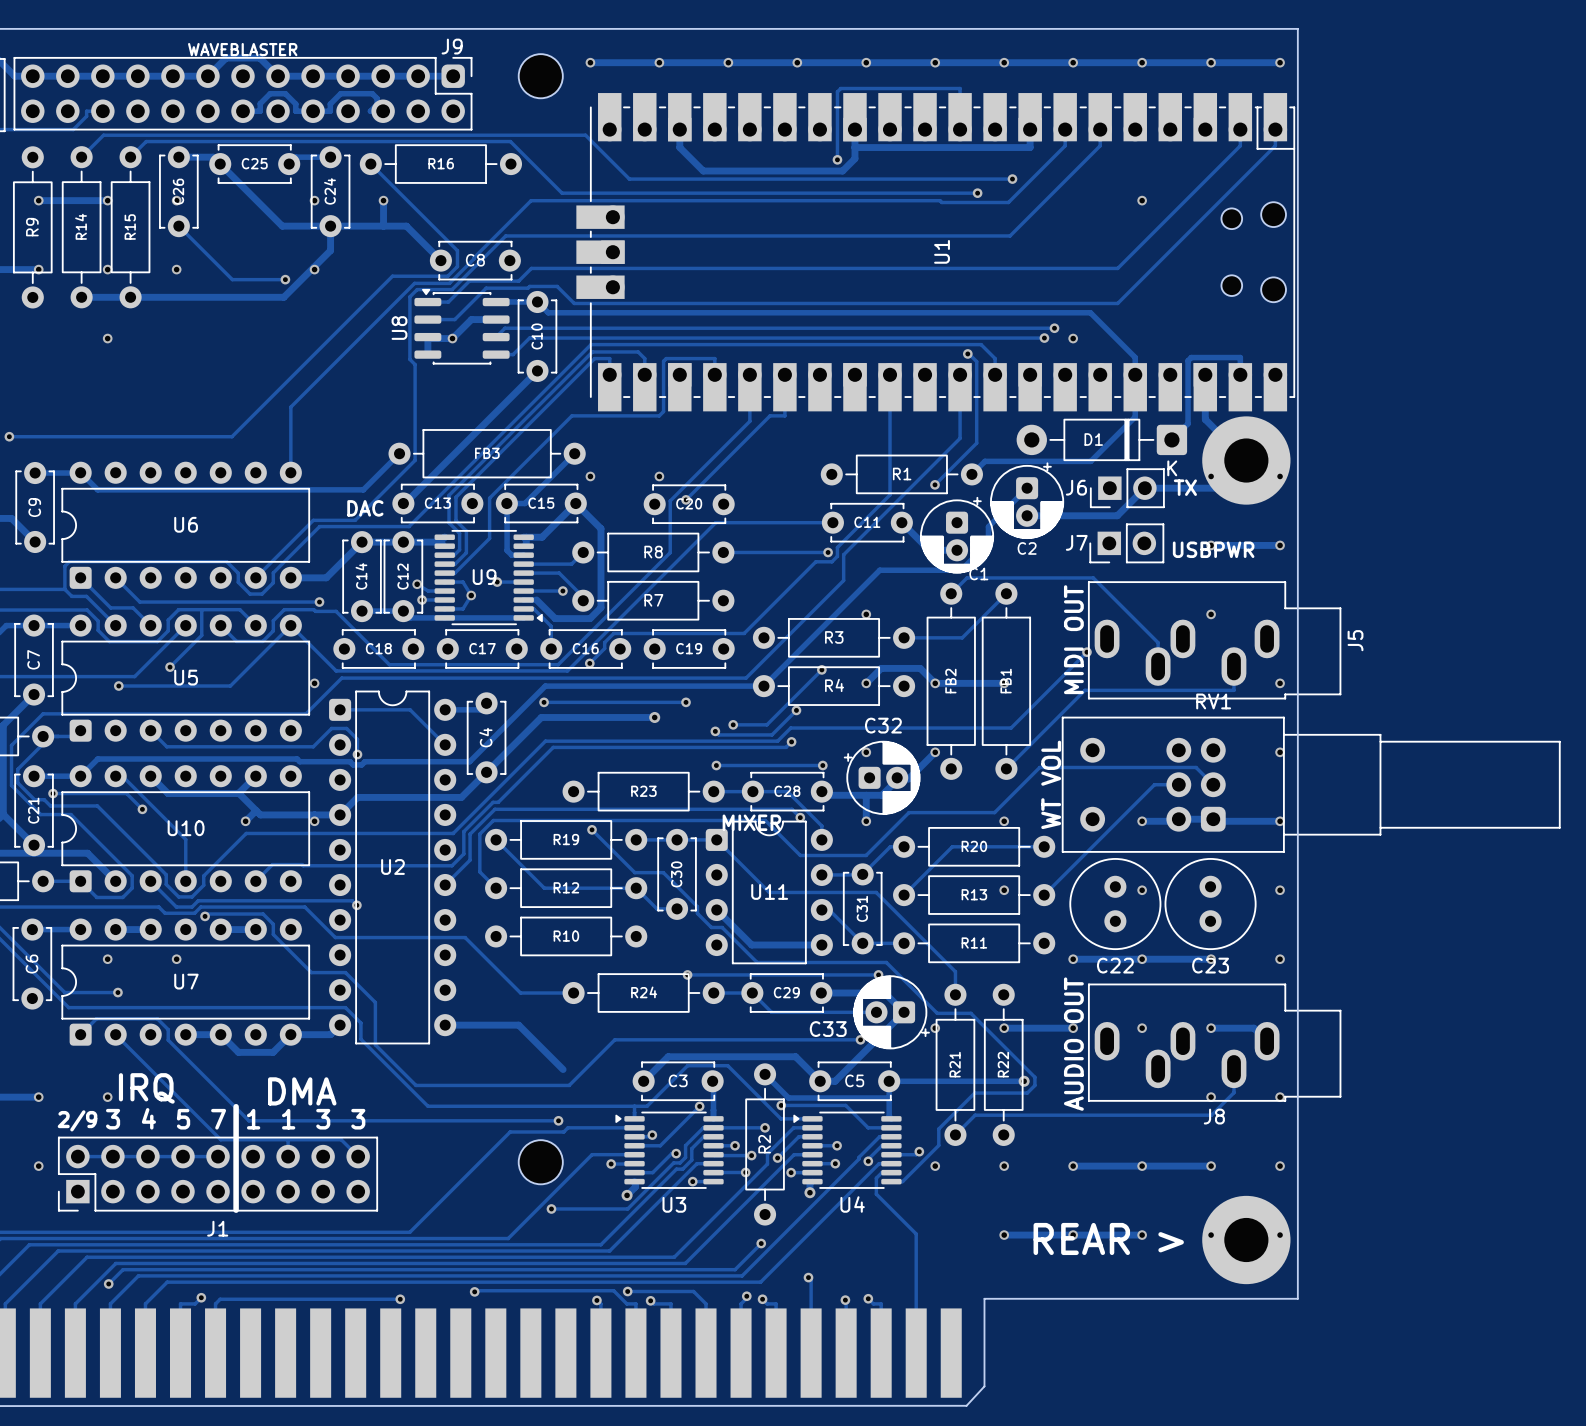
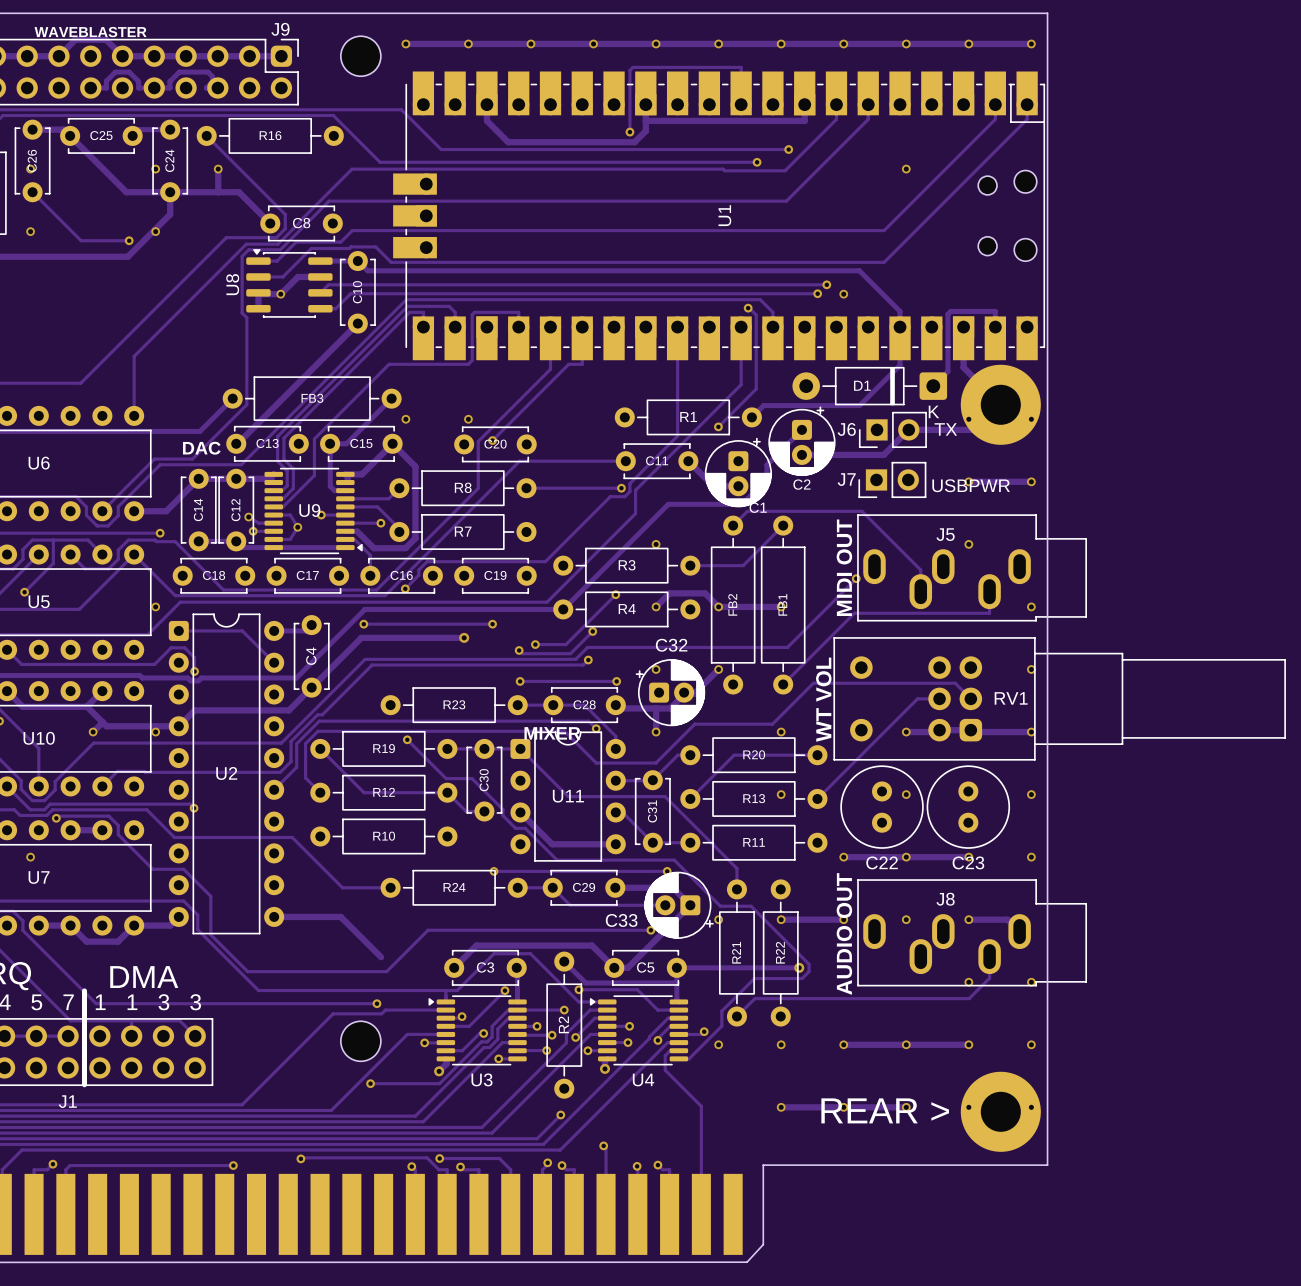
J5 name rotation: 0° (1355, 640) -> 90° clockwise (945, 534)
J5 name position: J5 (1355, 640) -> J5 (945, 534)
RV1 name position: RV1 (1213, 701) -> RV1 (1011, 698)
J8 name position: J8 (1214, 1116) -> J8 (945, 899)

